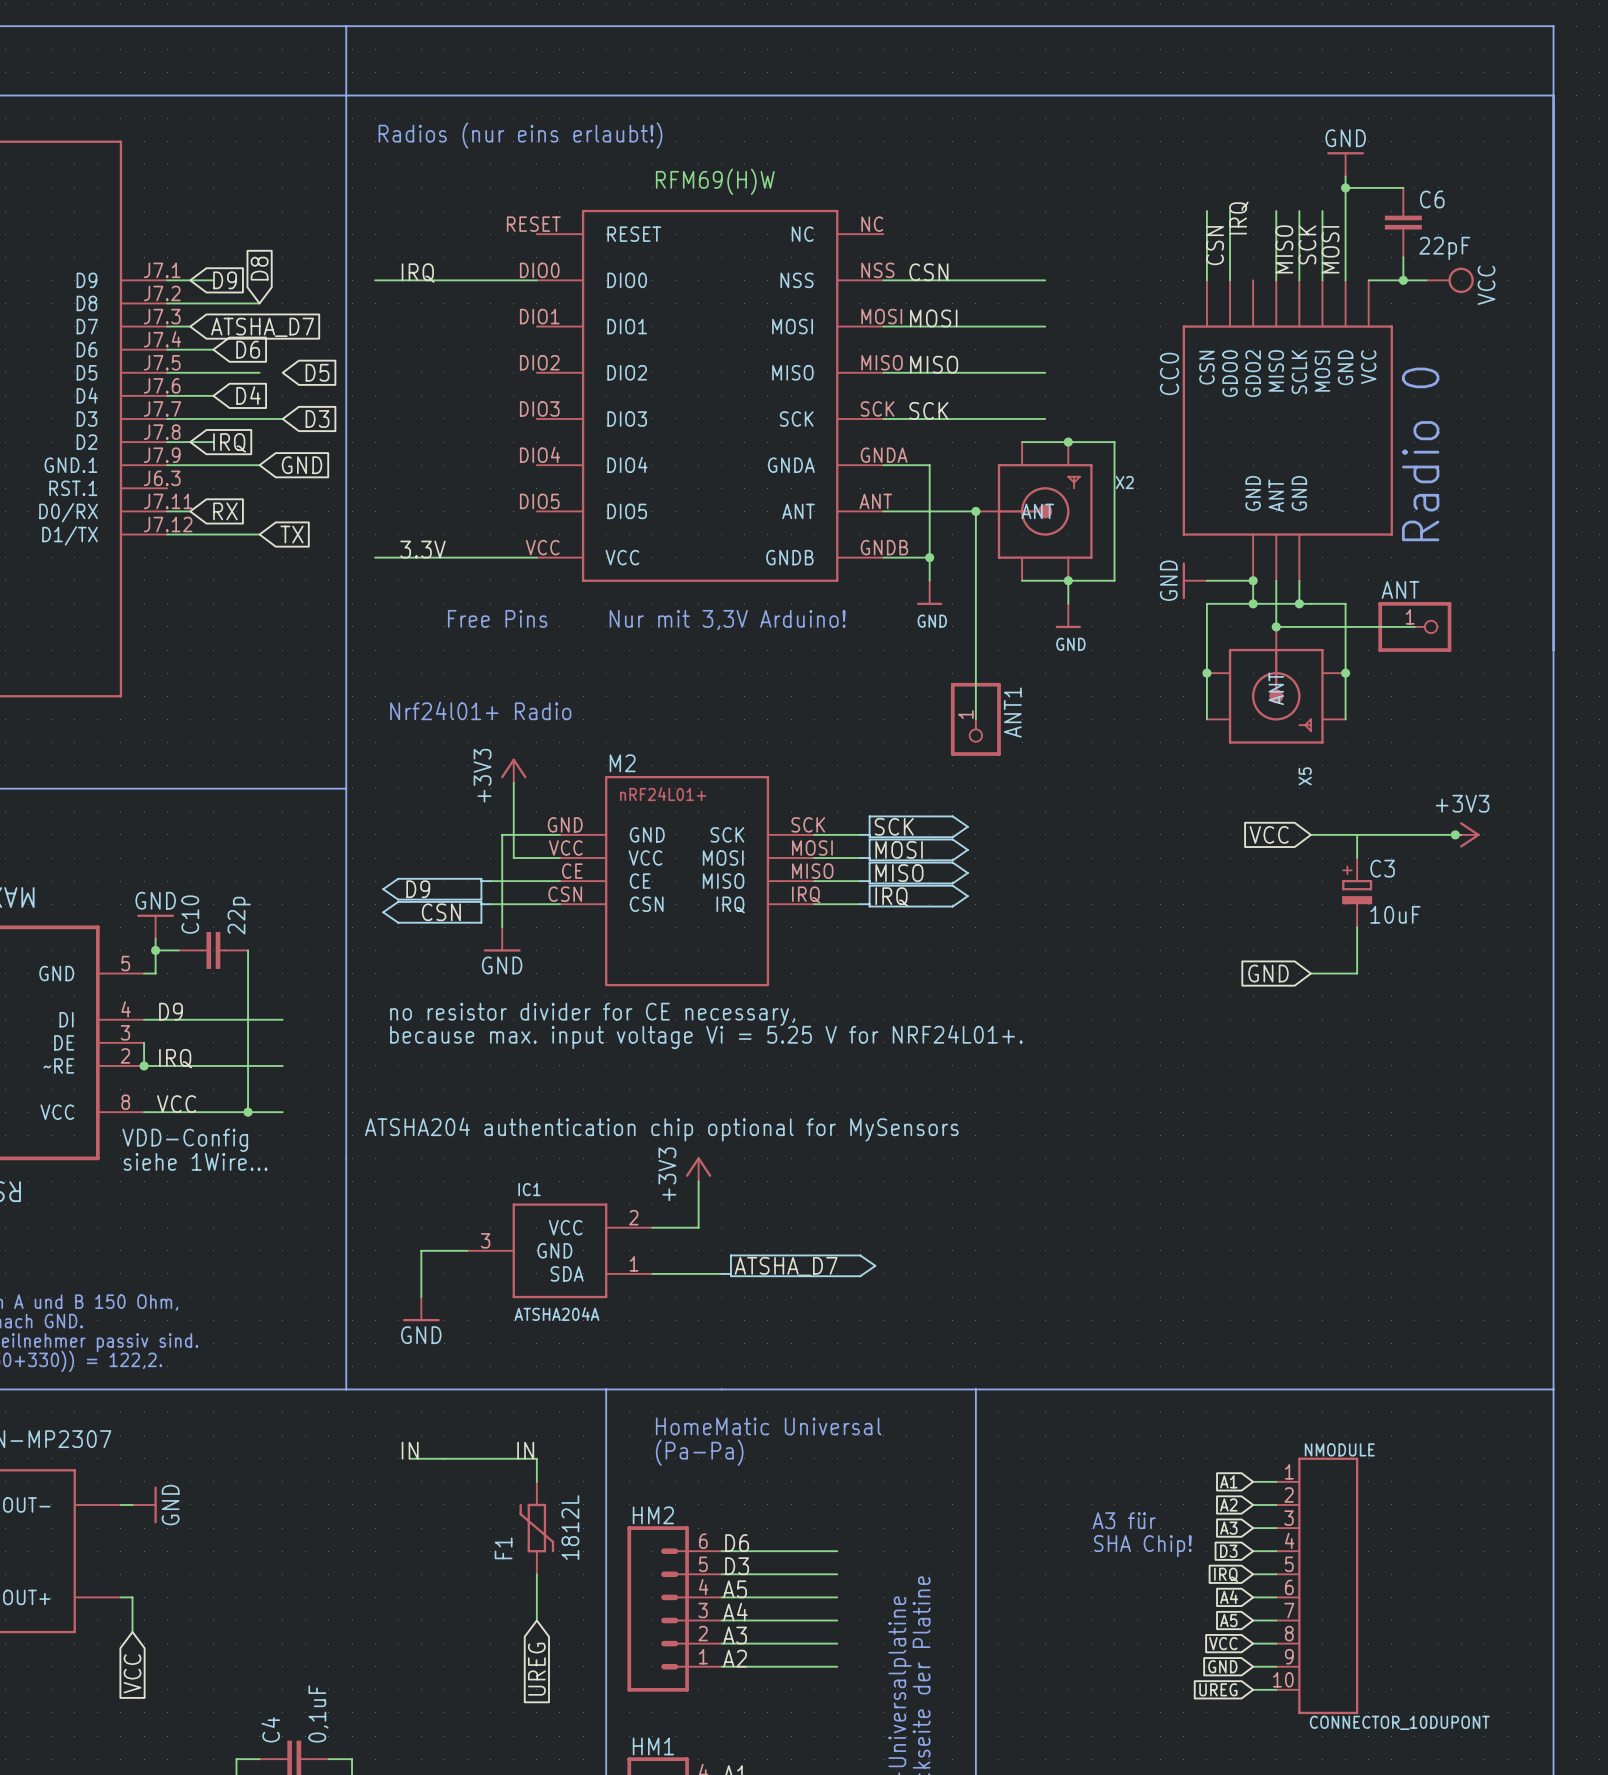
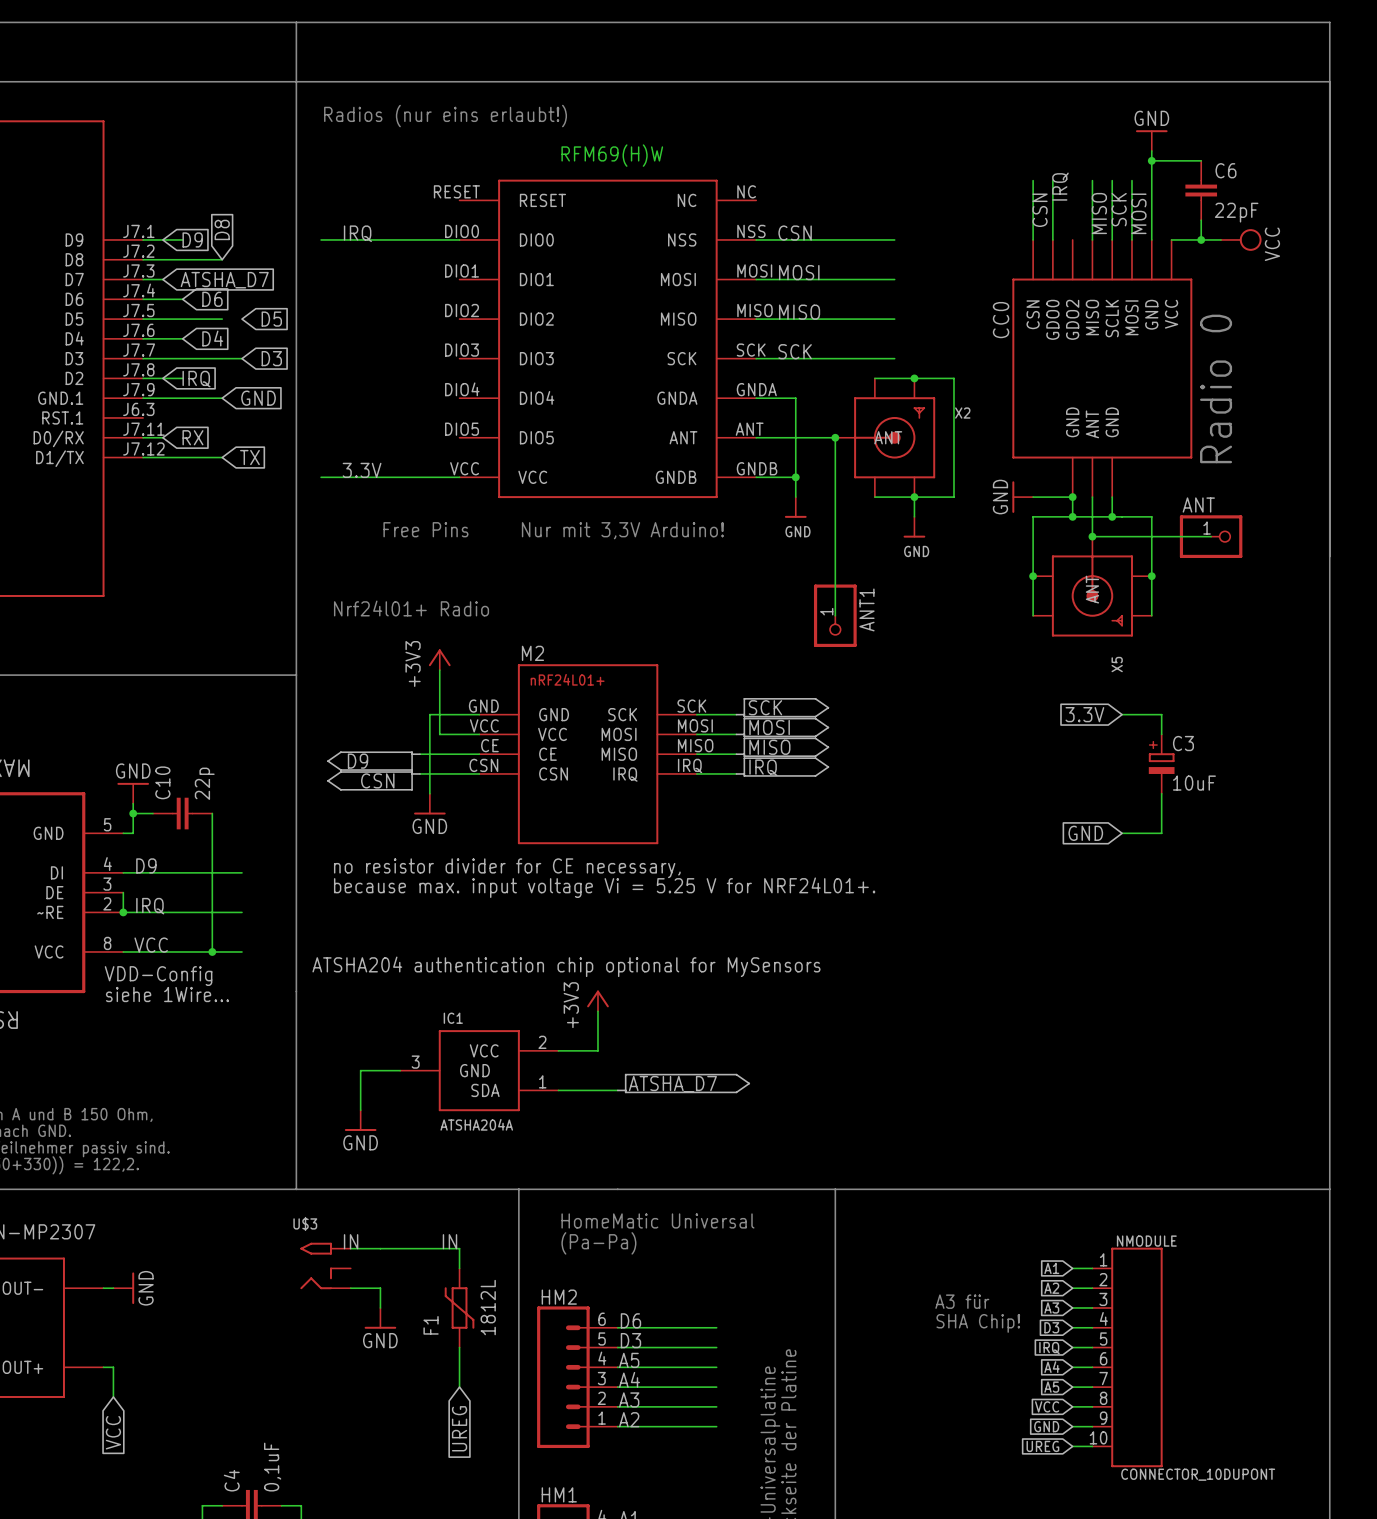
global label: VCC (1269, 834) -> 3.3V (1084, 714)
wire: (1357, 834) (1461, 834) -> none
junction: (1455, 834) -> none
power symbol: +3V3 (1467, 834) -> none
U$3: none -> (325, 1265)
wire: none -> (350, 1288) (380, 1288) (380, 1307)
power symbol: none -> GND (380, 1318)

